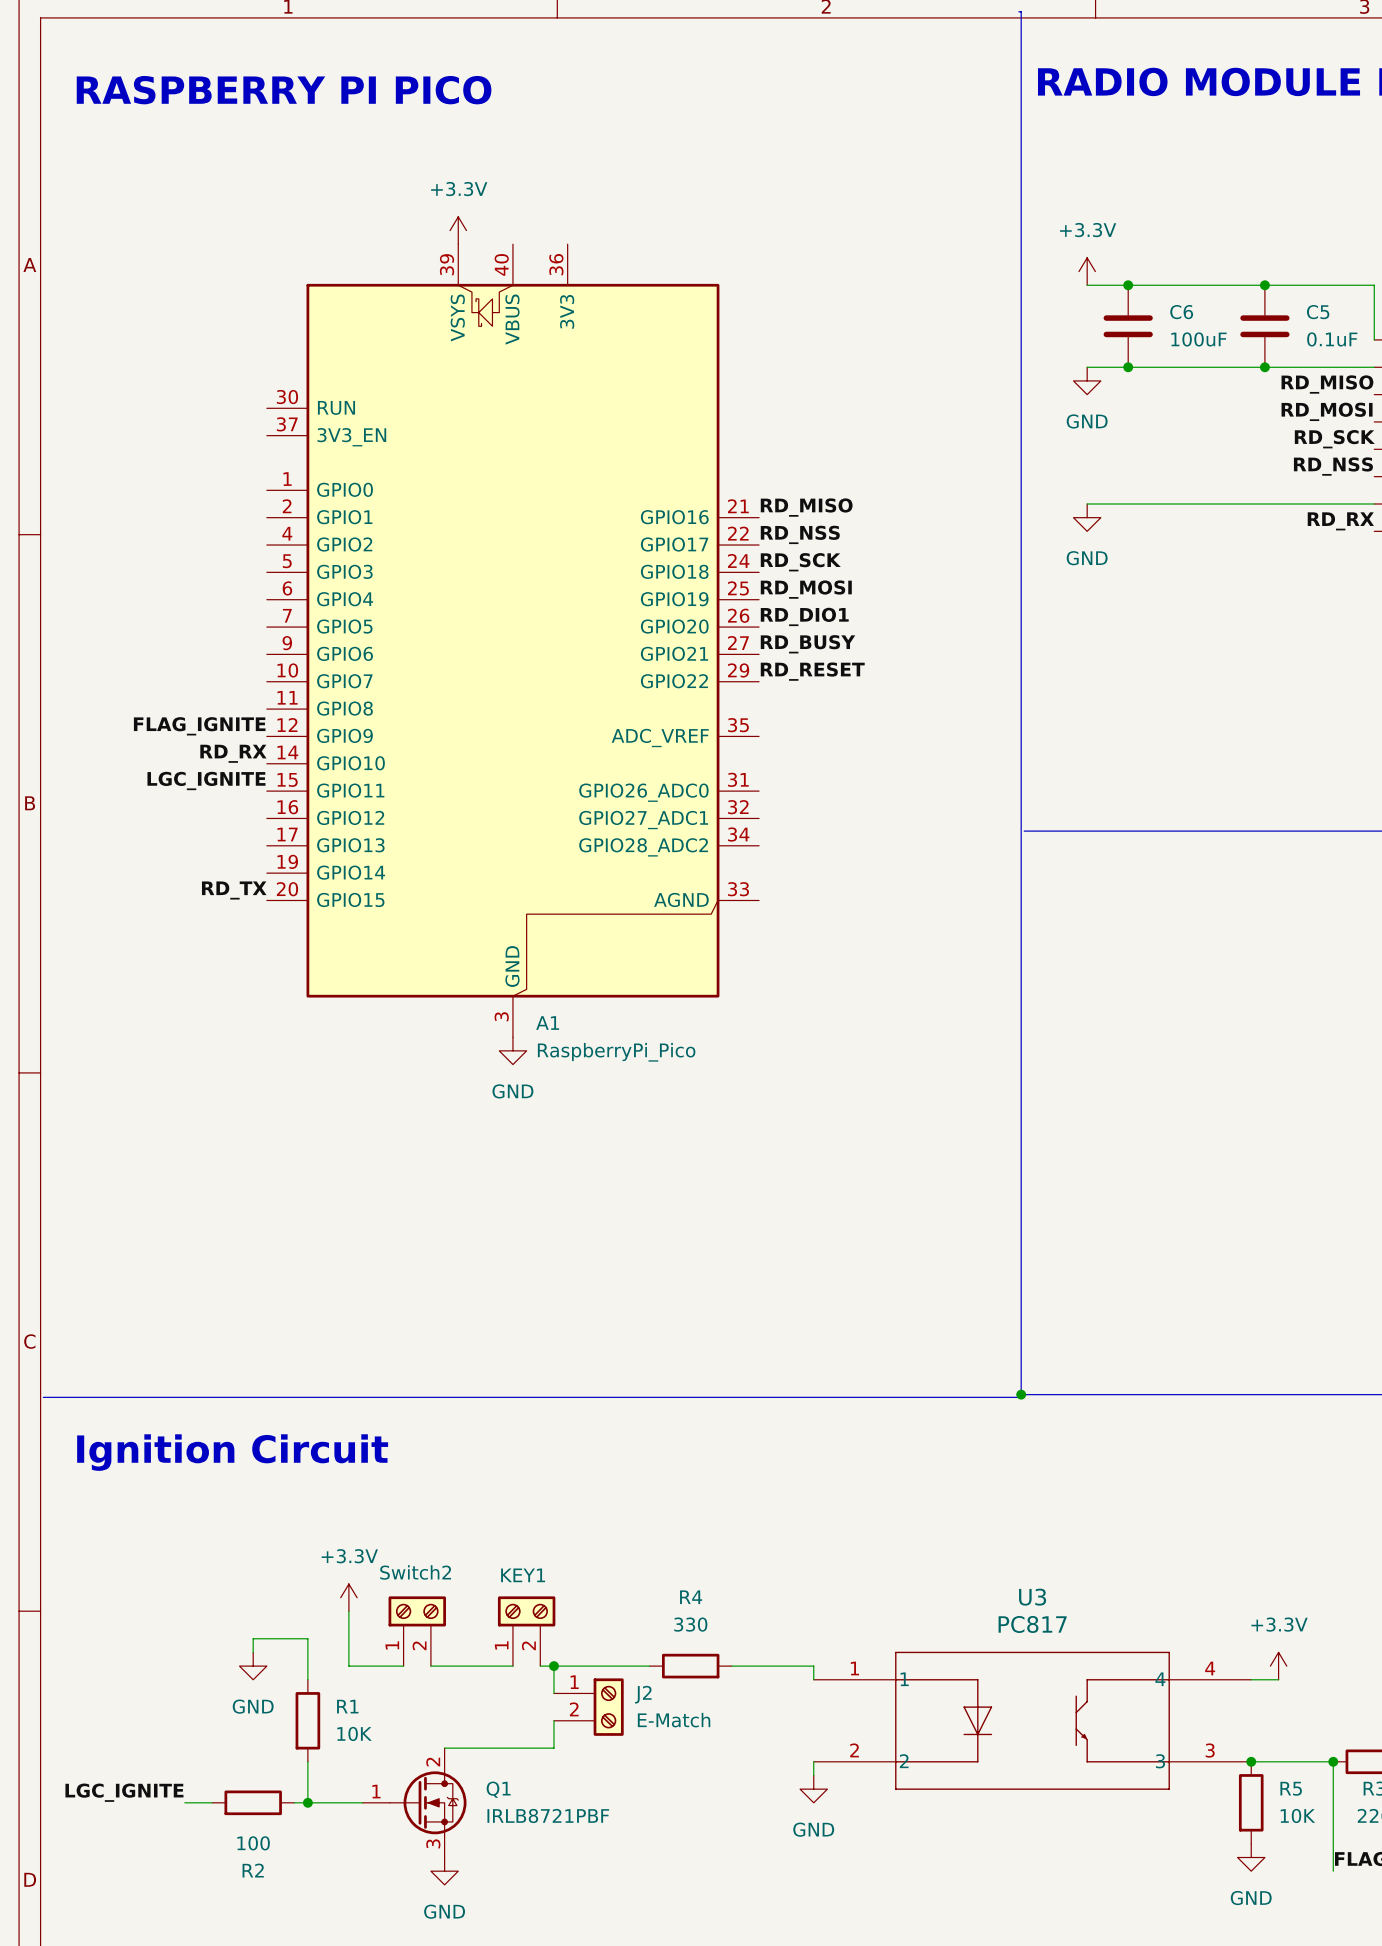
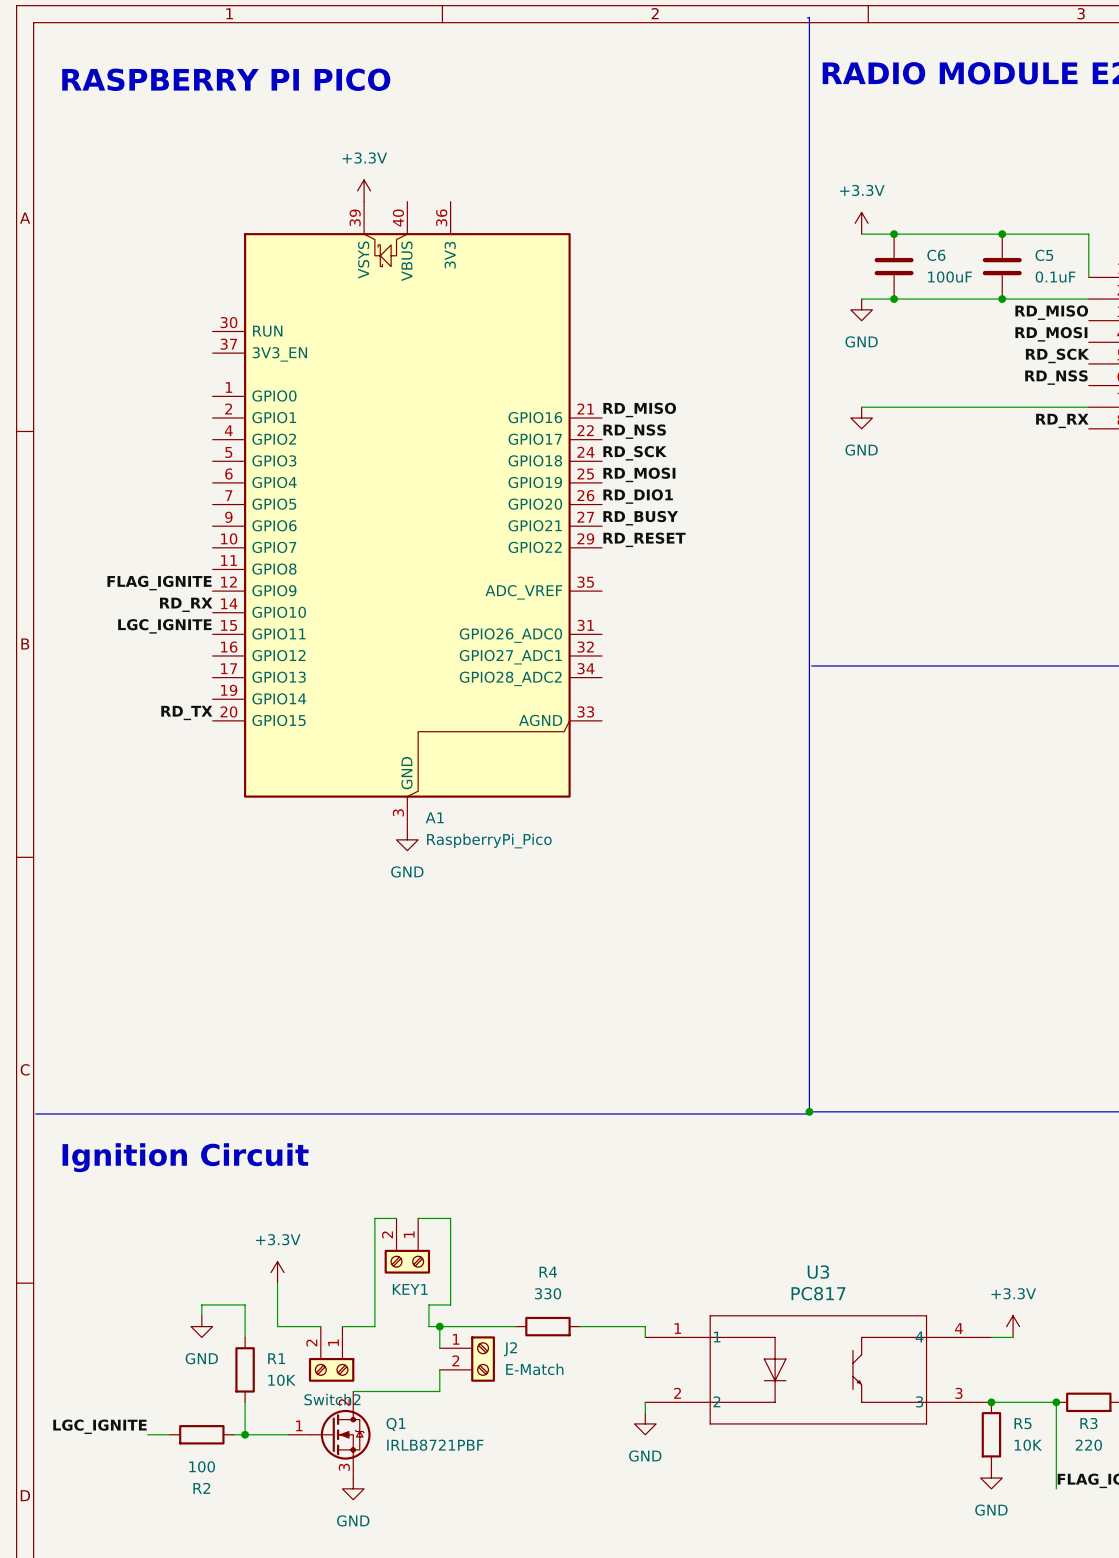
wire: none -> (418, 1218) (450, 1218) (450, 1304) (428, 1304) (428, 1326)
Switch2 rotation: 0° (417, 1611) -> 180° (331, 1369)
KEY1 rotation: 0° (526, 1611) -> 180° (407, 1261)
Switch2 position: (417, 1631) -> (331, 1354)
KEY1 position: (526, 1631) -> (407, 1246)
wire: (471, 1666) (512, 1666) -> (374, 1326) (374, 1218) (396, 1218)

